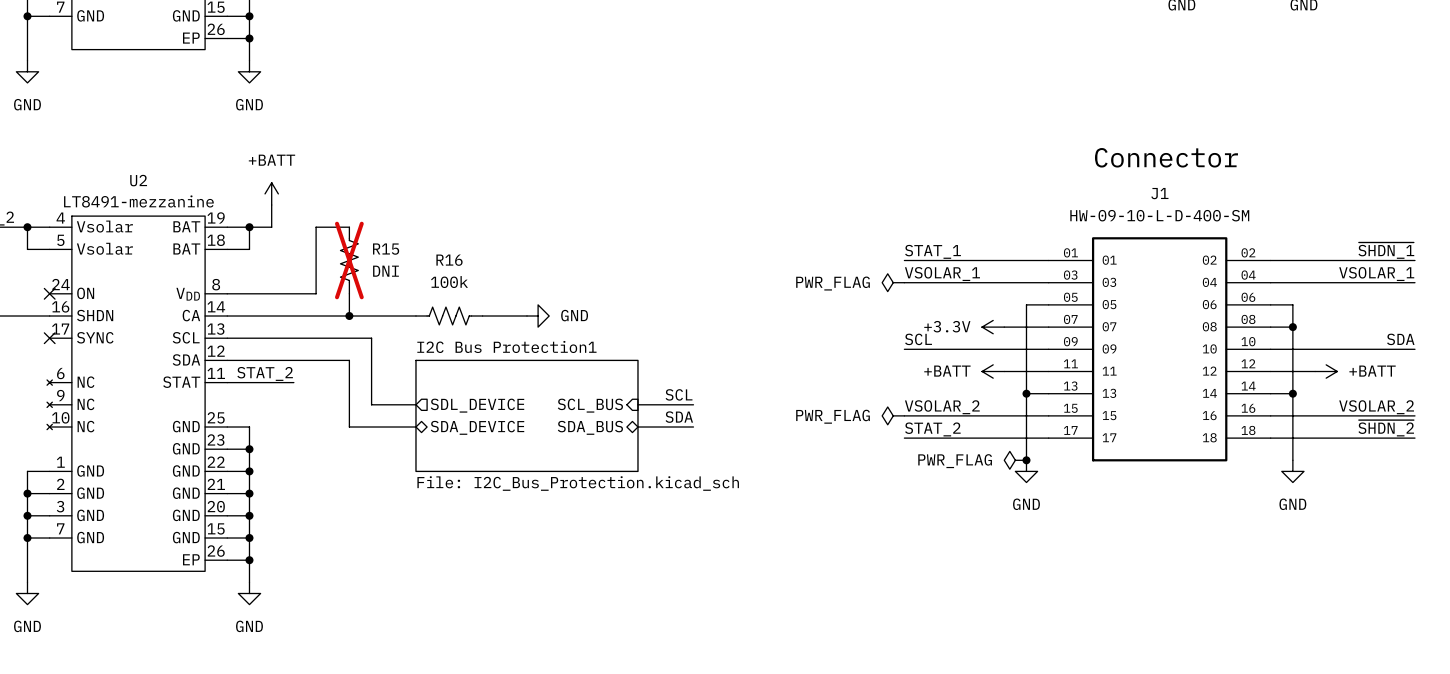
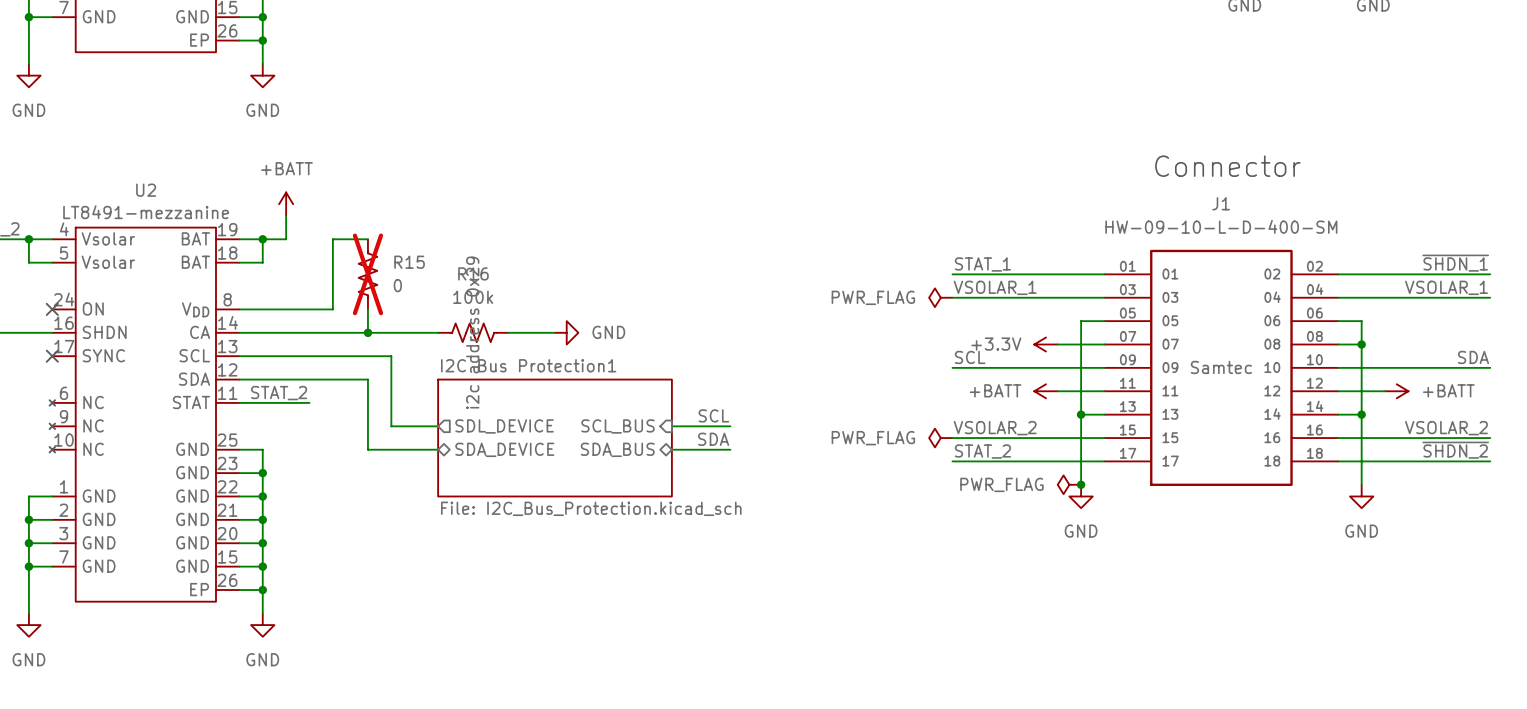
R15 value: DNI (385, 271) -> 0 (397, 285)
R16 text: none -> i2c address 0x29 (472, 332)
J1 text: none -> Samtec (1221, 367)

